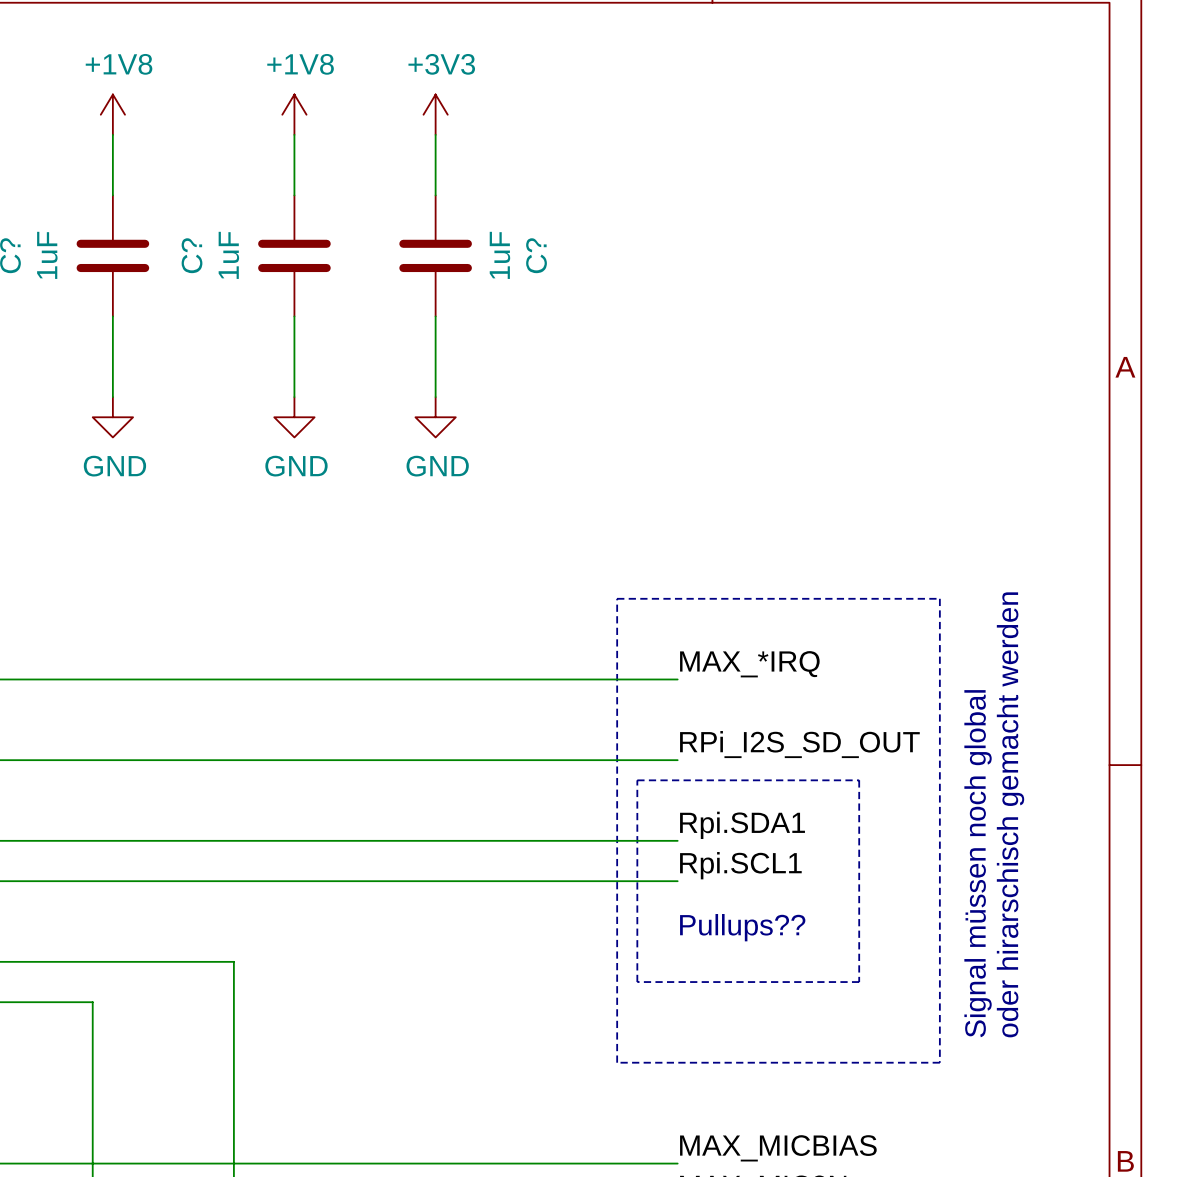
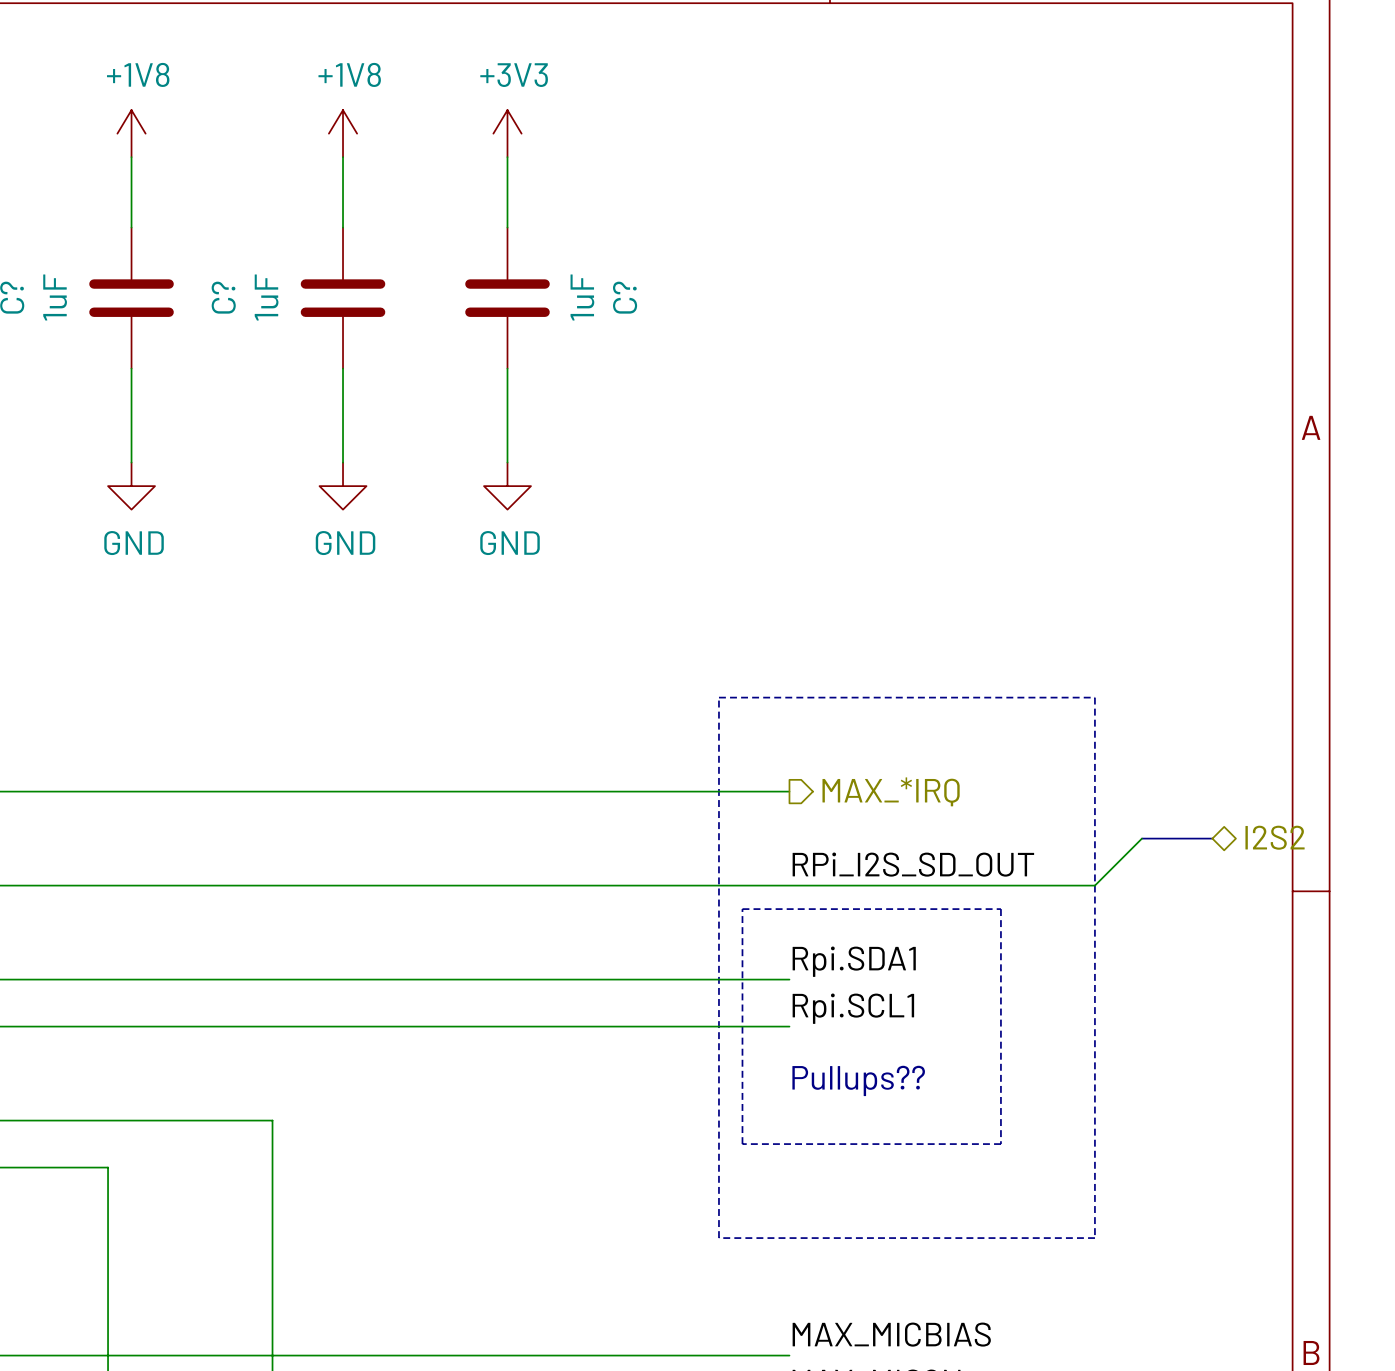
label: MAX_*IRQ (749, 664) -> none
hierarchical label: none -> MAX_*IRQ (891, 791)
wire: none -> (1141, 838) (1094, 885) (789, 885)
bus: none -> (1141, 838) (1212, 838)
hierarchical label: none -> I2S2 (1275, 837)
text: oder hirarschisch gemacht werden (1010, 814) -> none
text: Signal müssen noch global (978, 863) -> none

